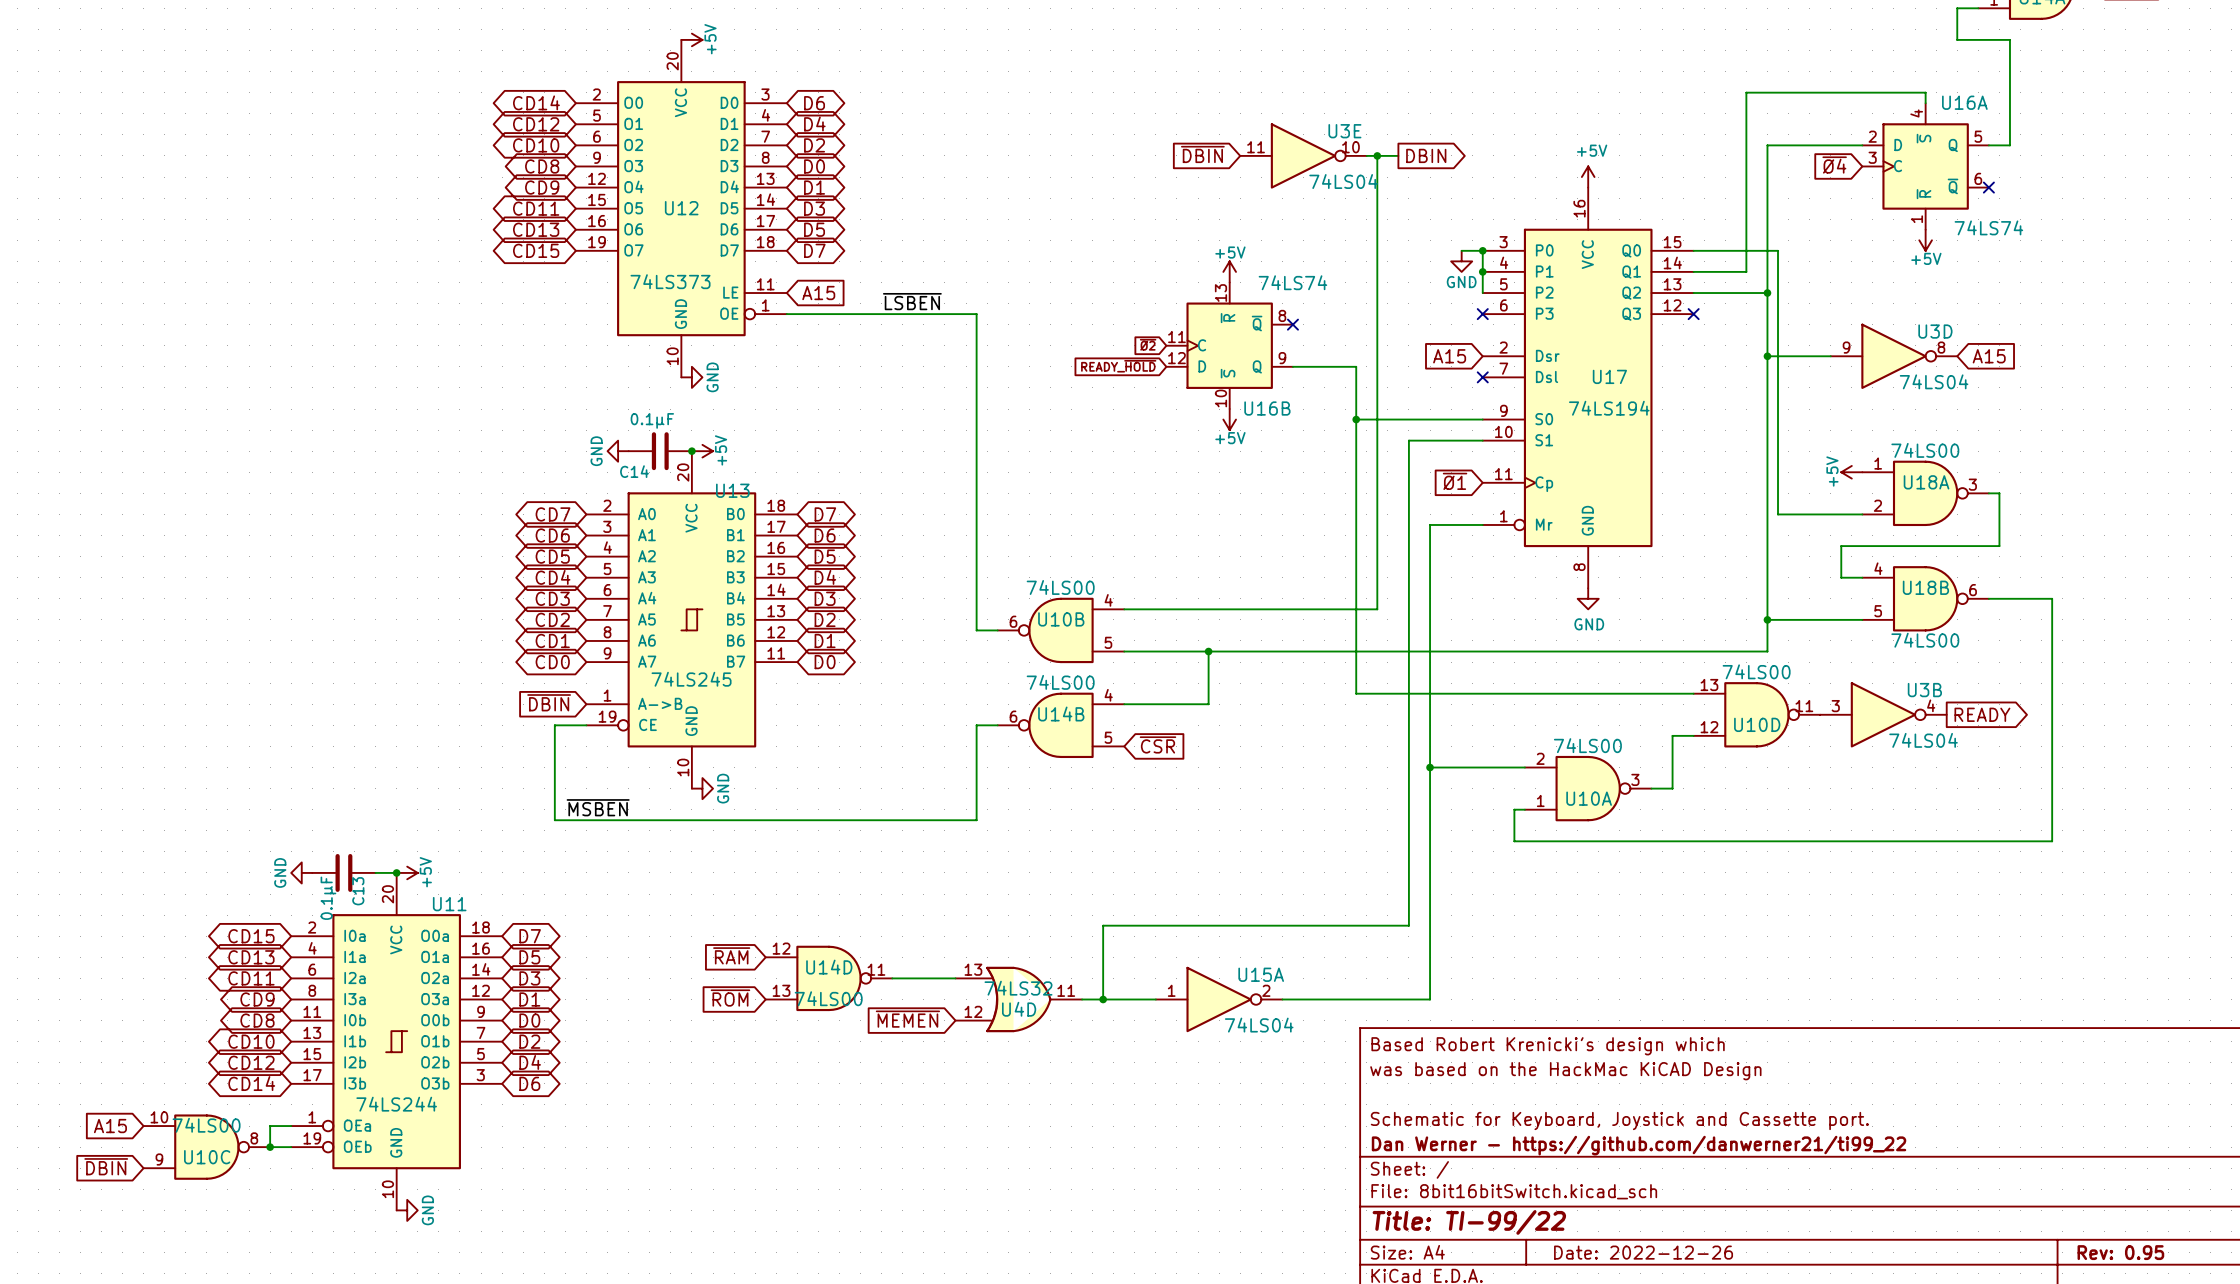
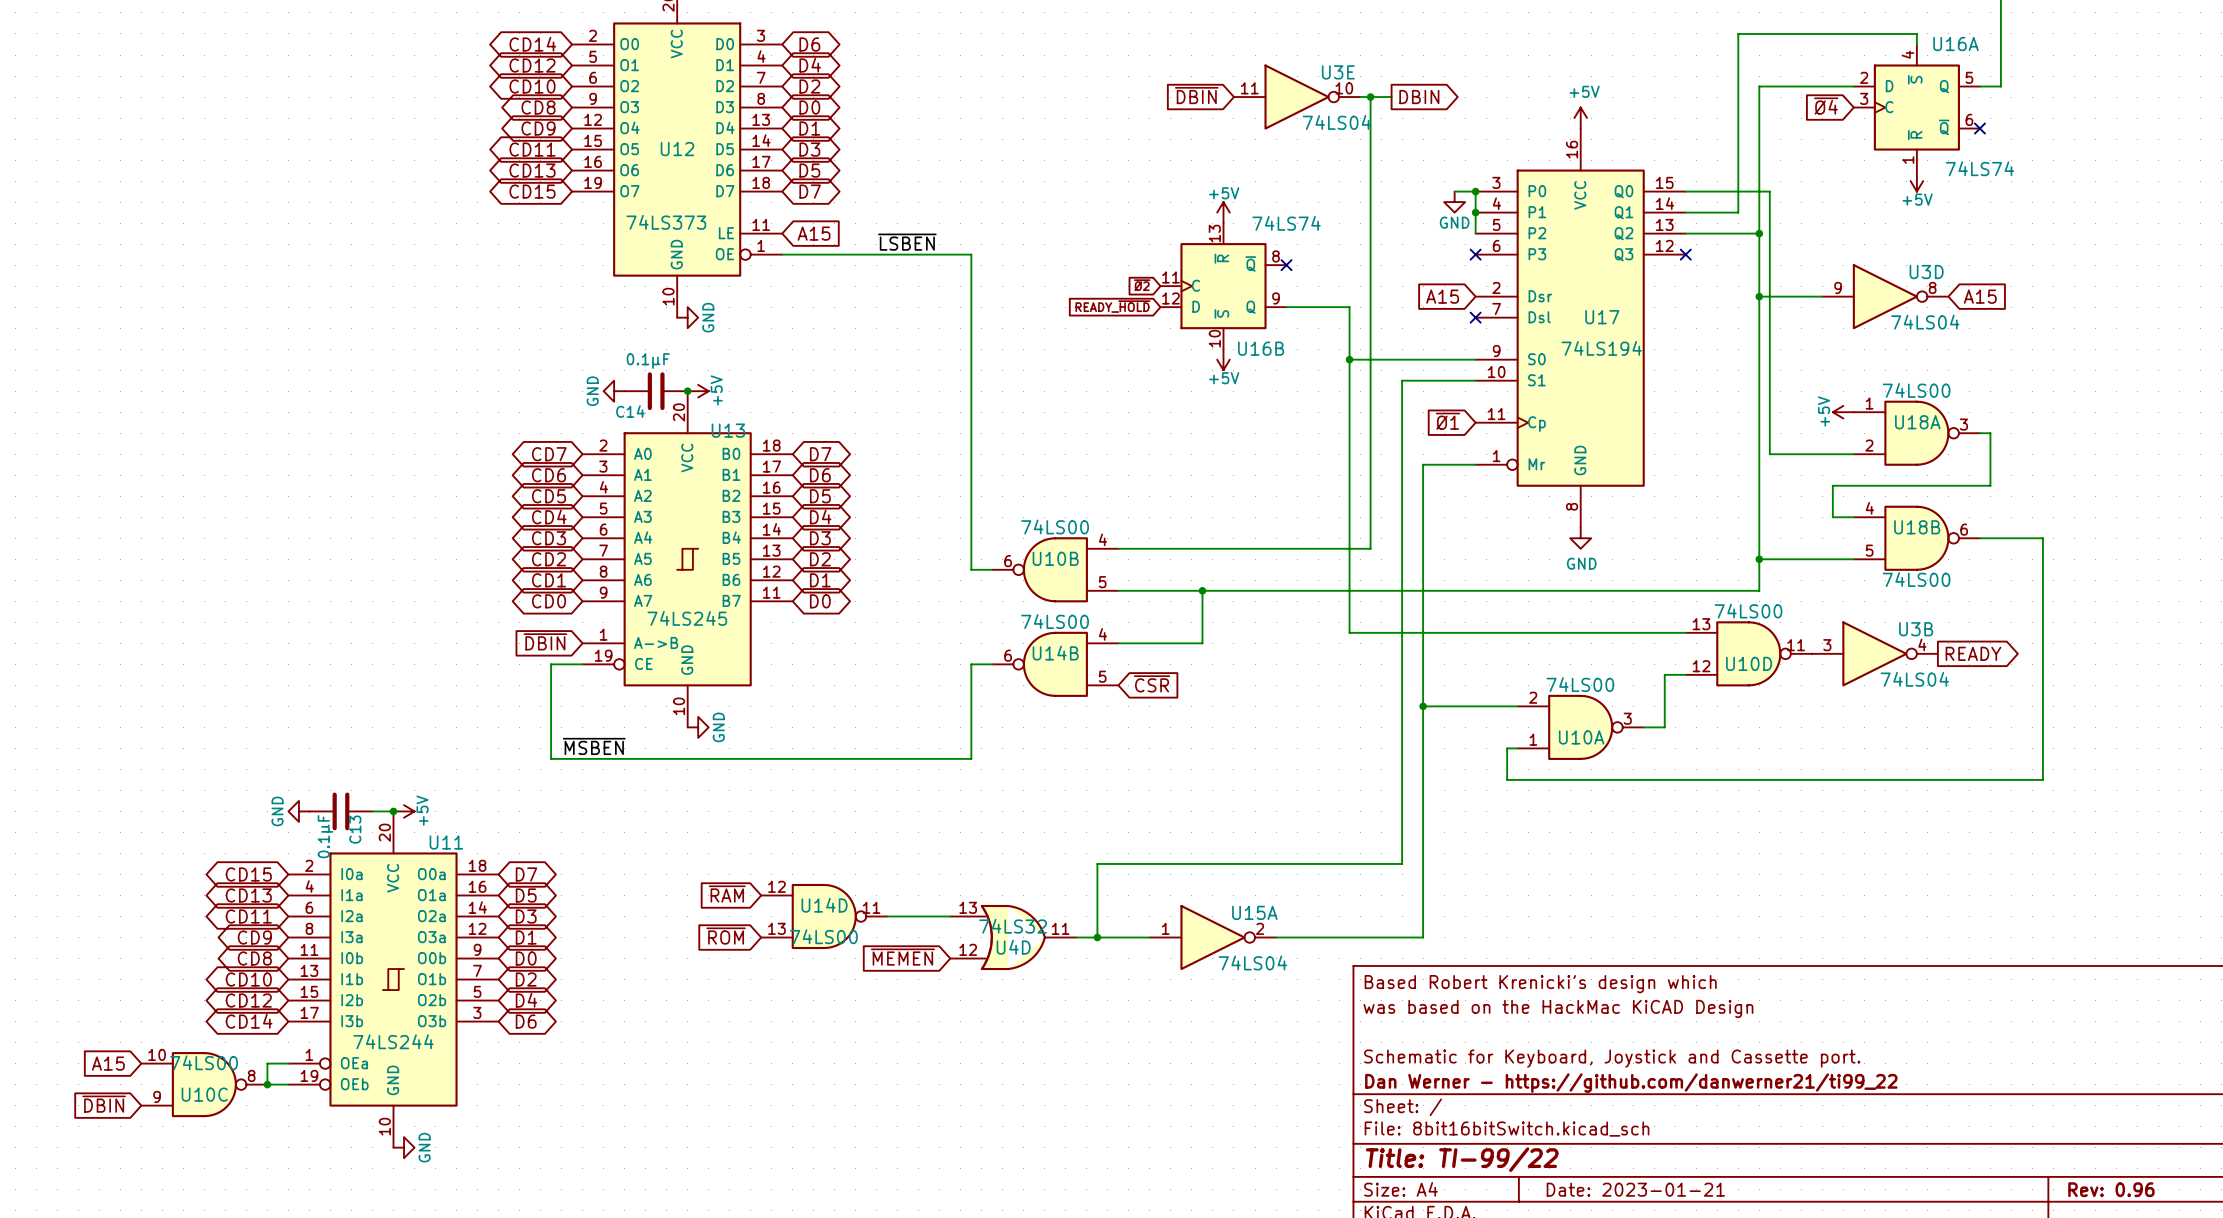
title block: Date: 2022-12-26 (1643, 1252) -> Date: 2023-01-21 (1635, 1189)
title block: Rev: 0.95 (2120, 1252) -> Rev: 0.96 (2111, 1189)

